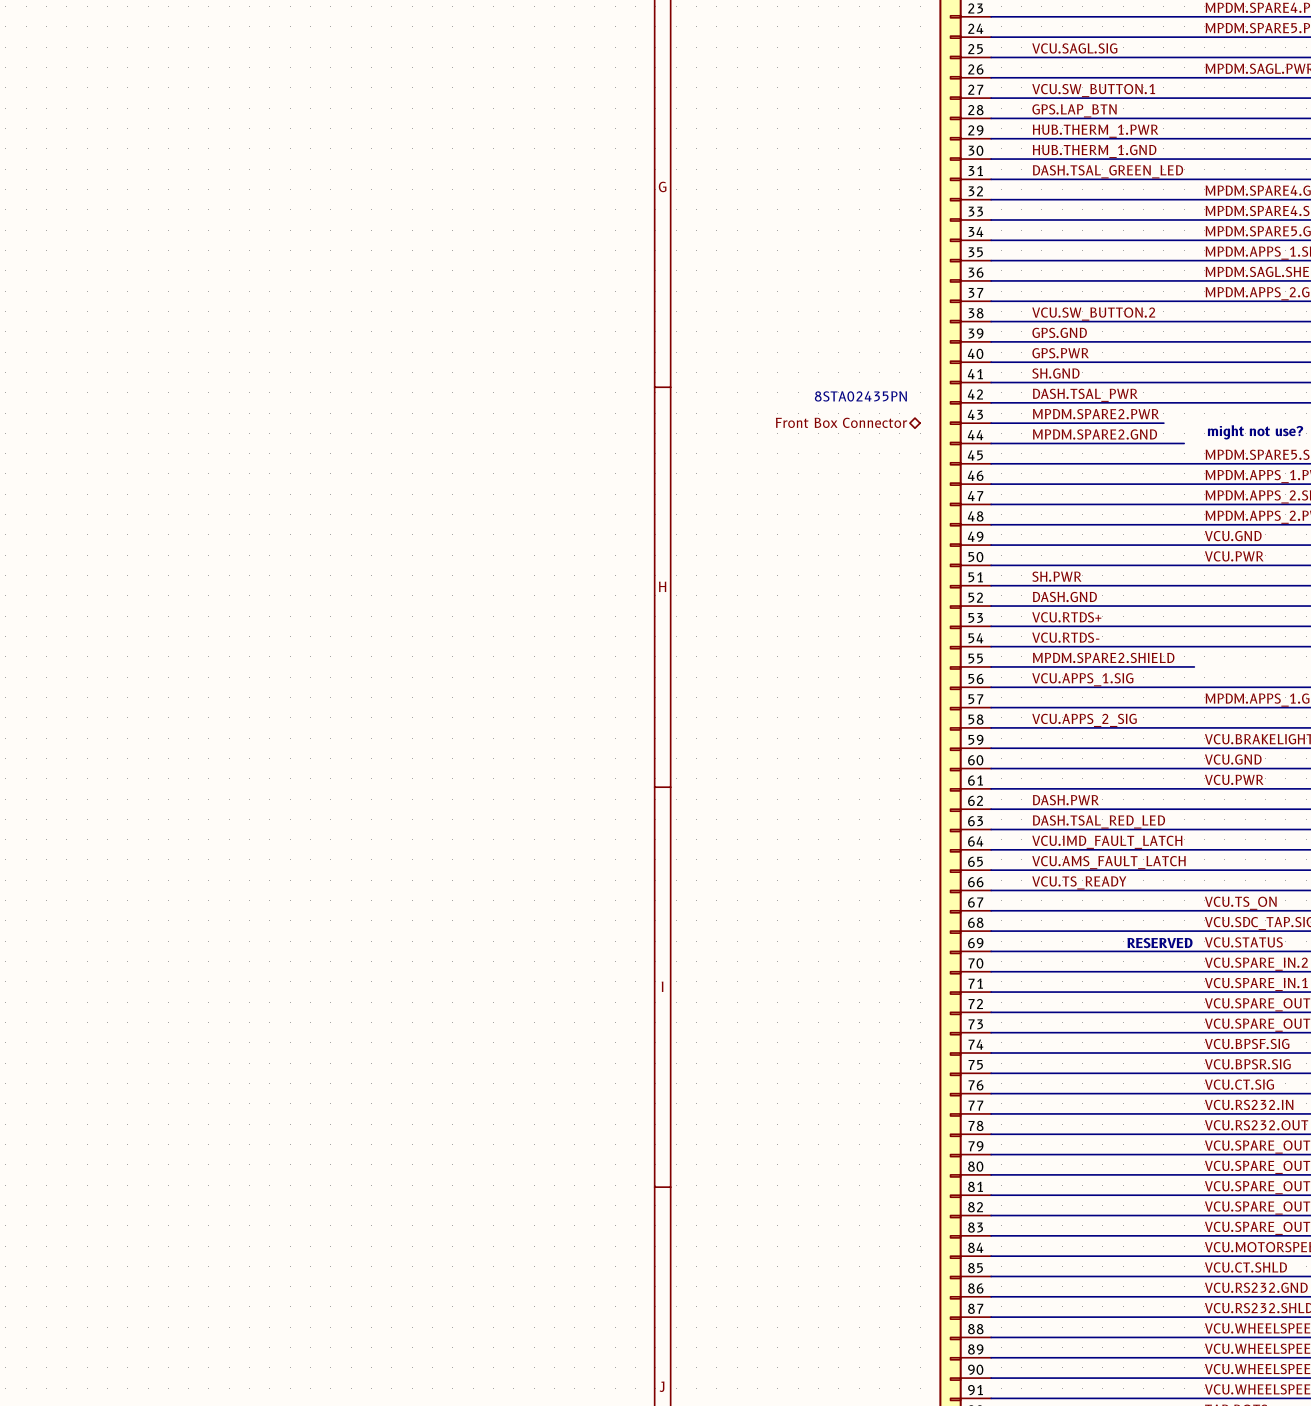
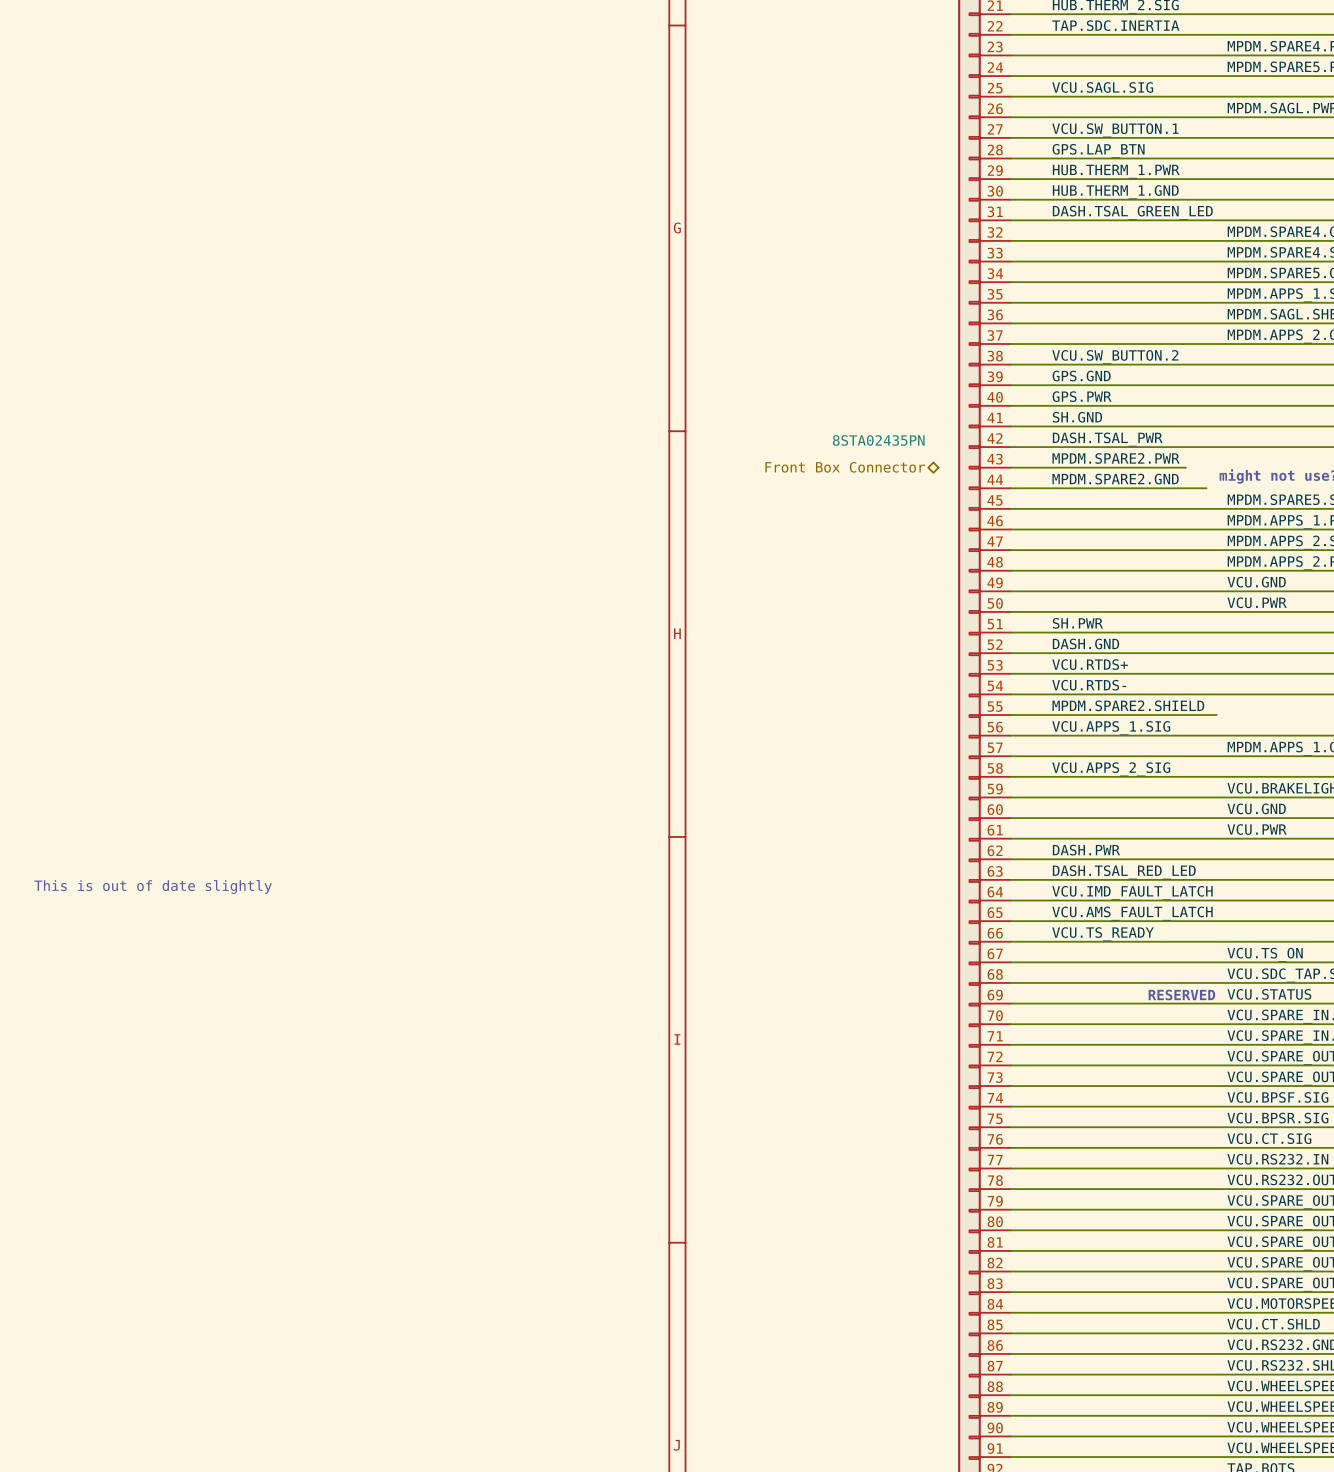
text: none -> This is out of date slightly (153, 887)

